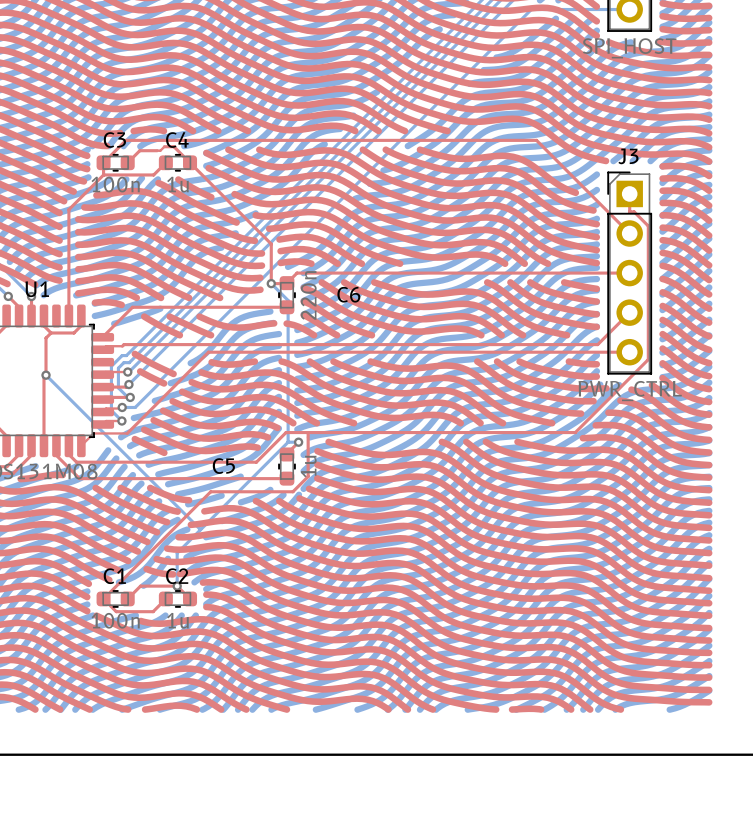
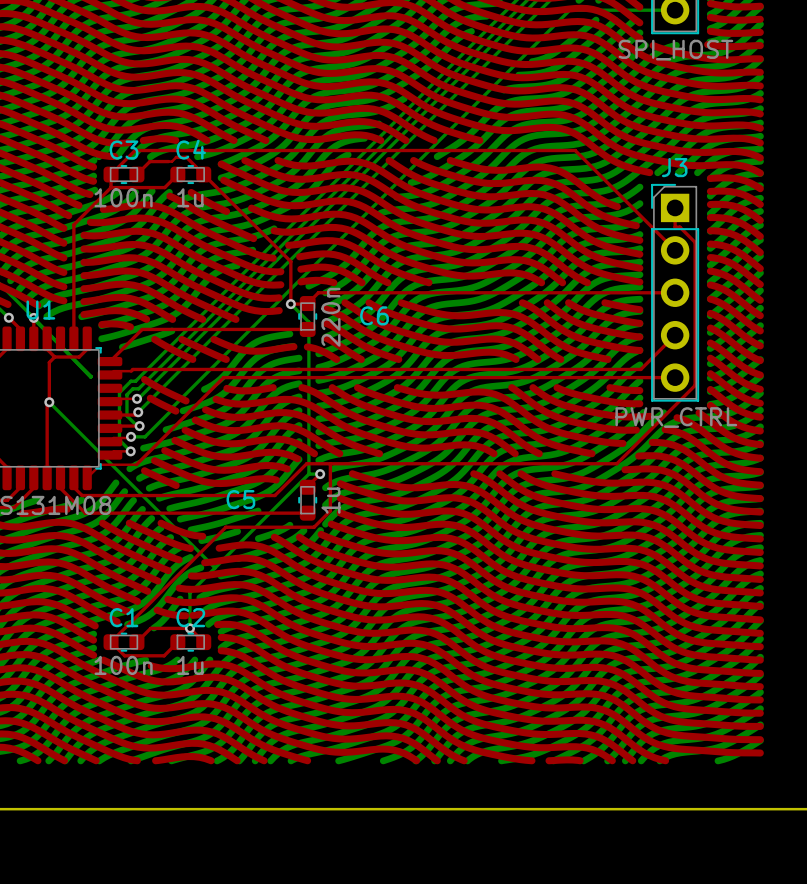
bottom track: none -> (33, 317) (90, 377) (91, 376) (33, 317)

